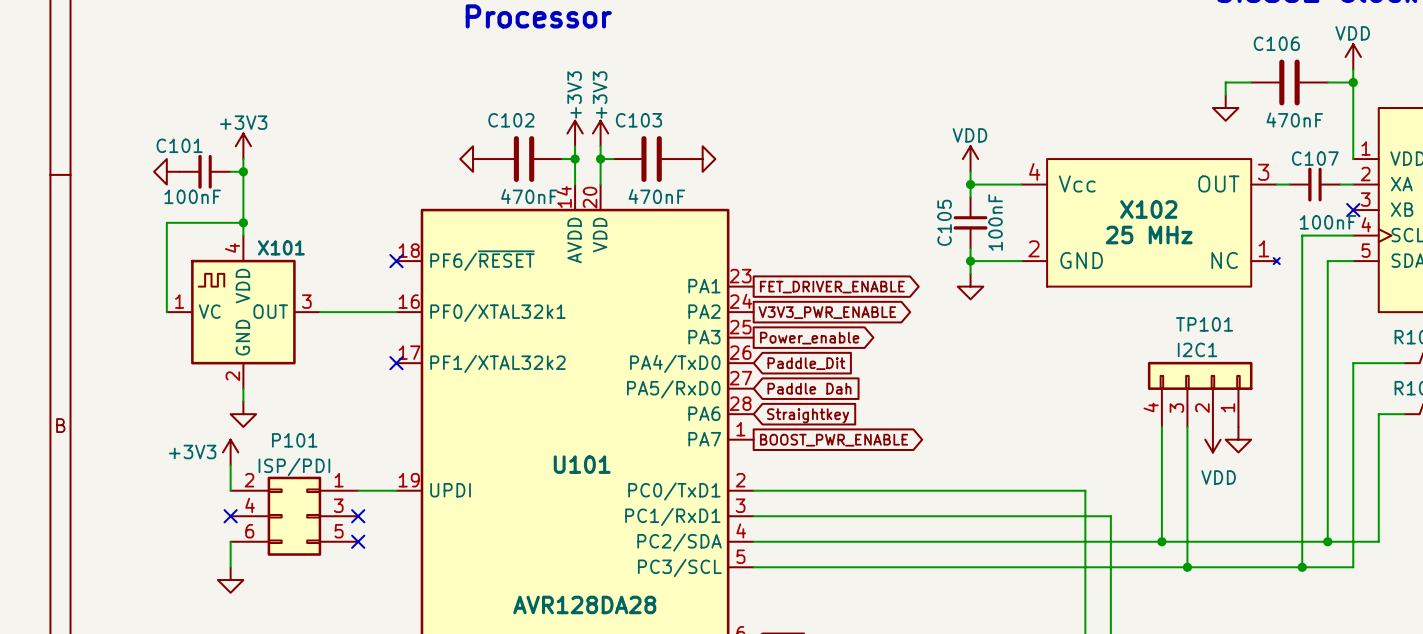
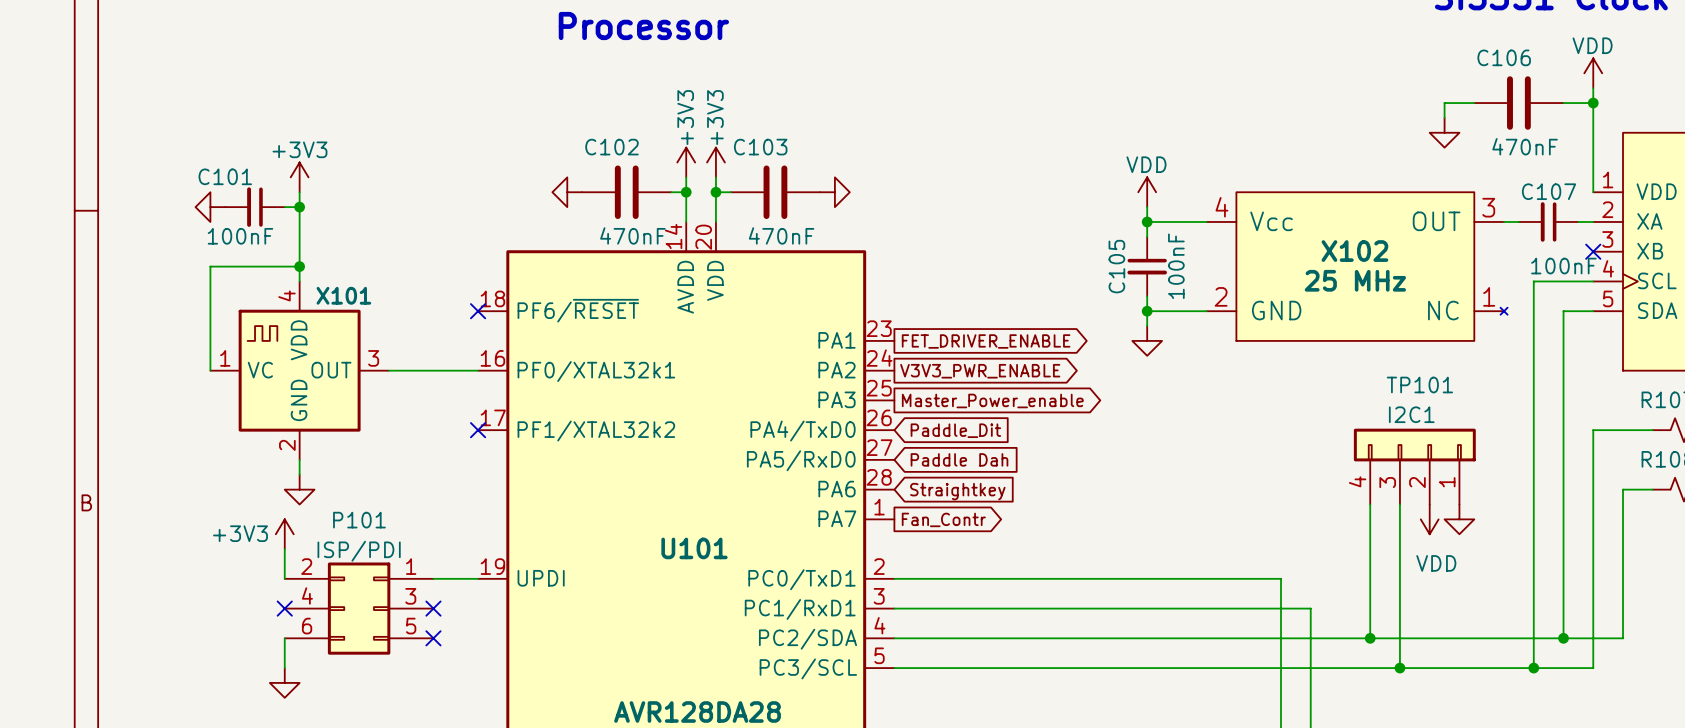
global label: Power_enable (809, 338) -> Master_Power_enable (992, 400)
global label: BOOST_PWR_ENABLE (834, 440) -> Fan_Contr (943, 519)

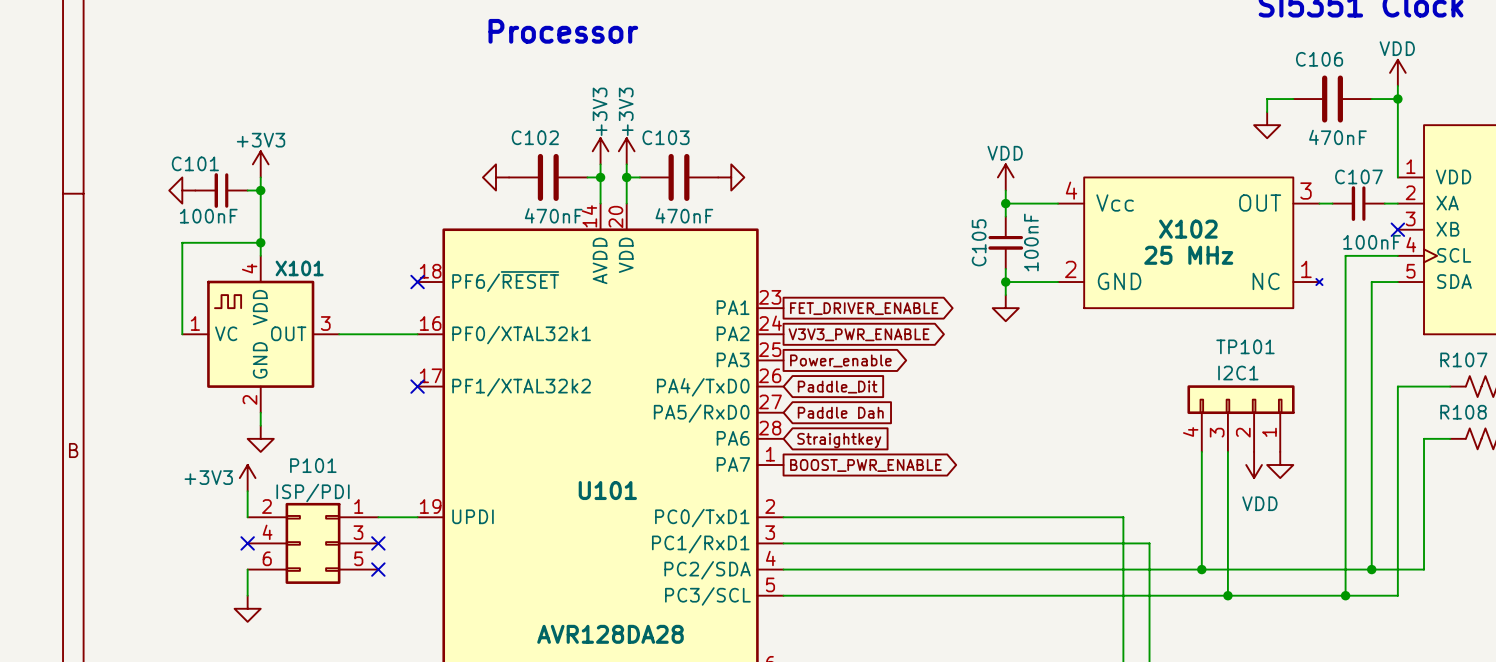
global label: Master_Power_enable (992, 400) -> Power_enable (840, 360)
global label: Fan_Contr (943, 519) -> BOOST_PWR_ENABLE (865, 465)

